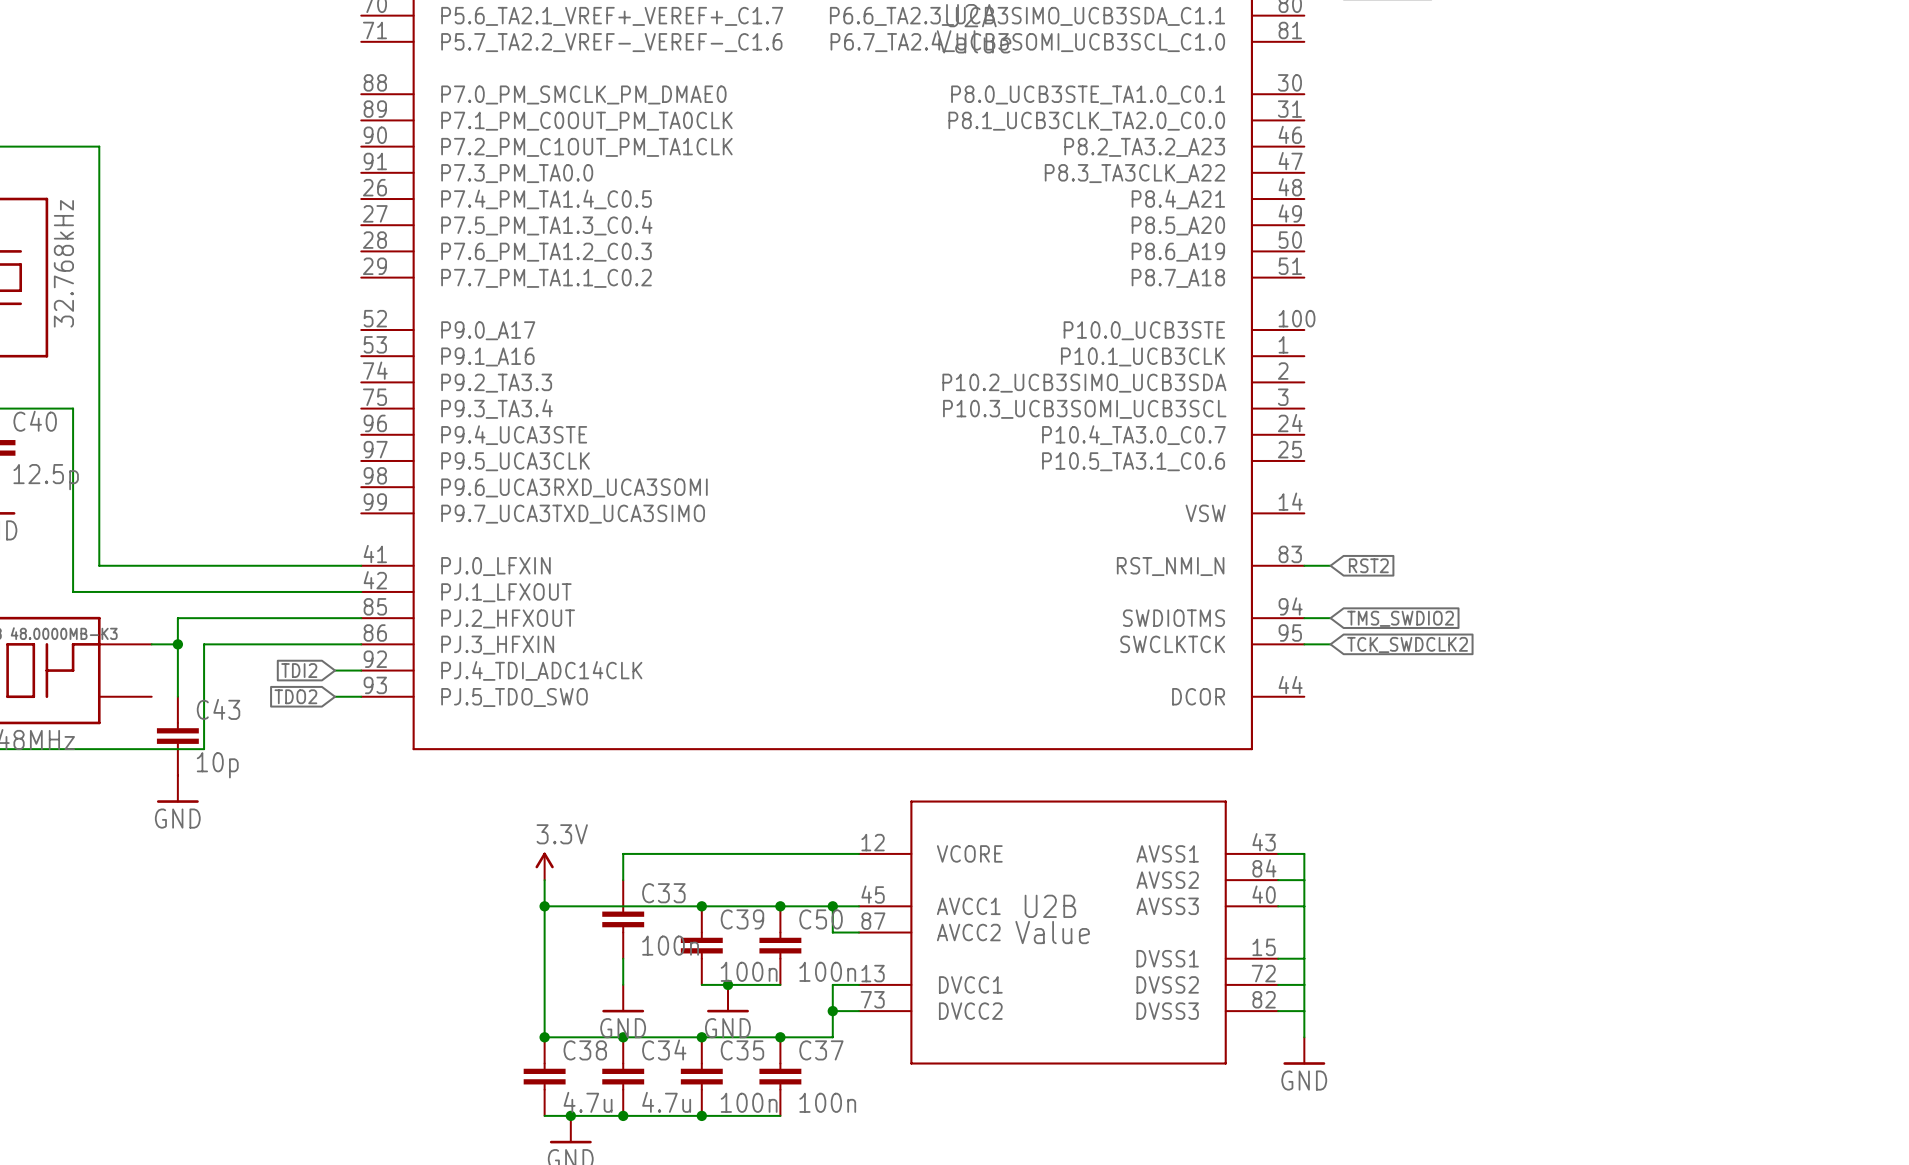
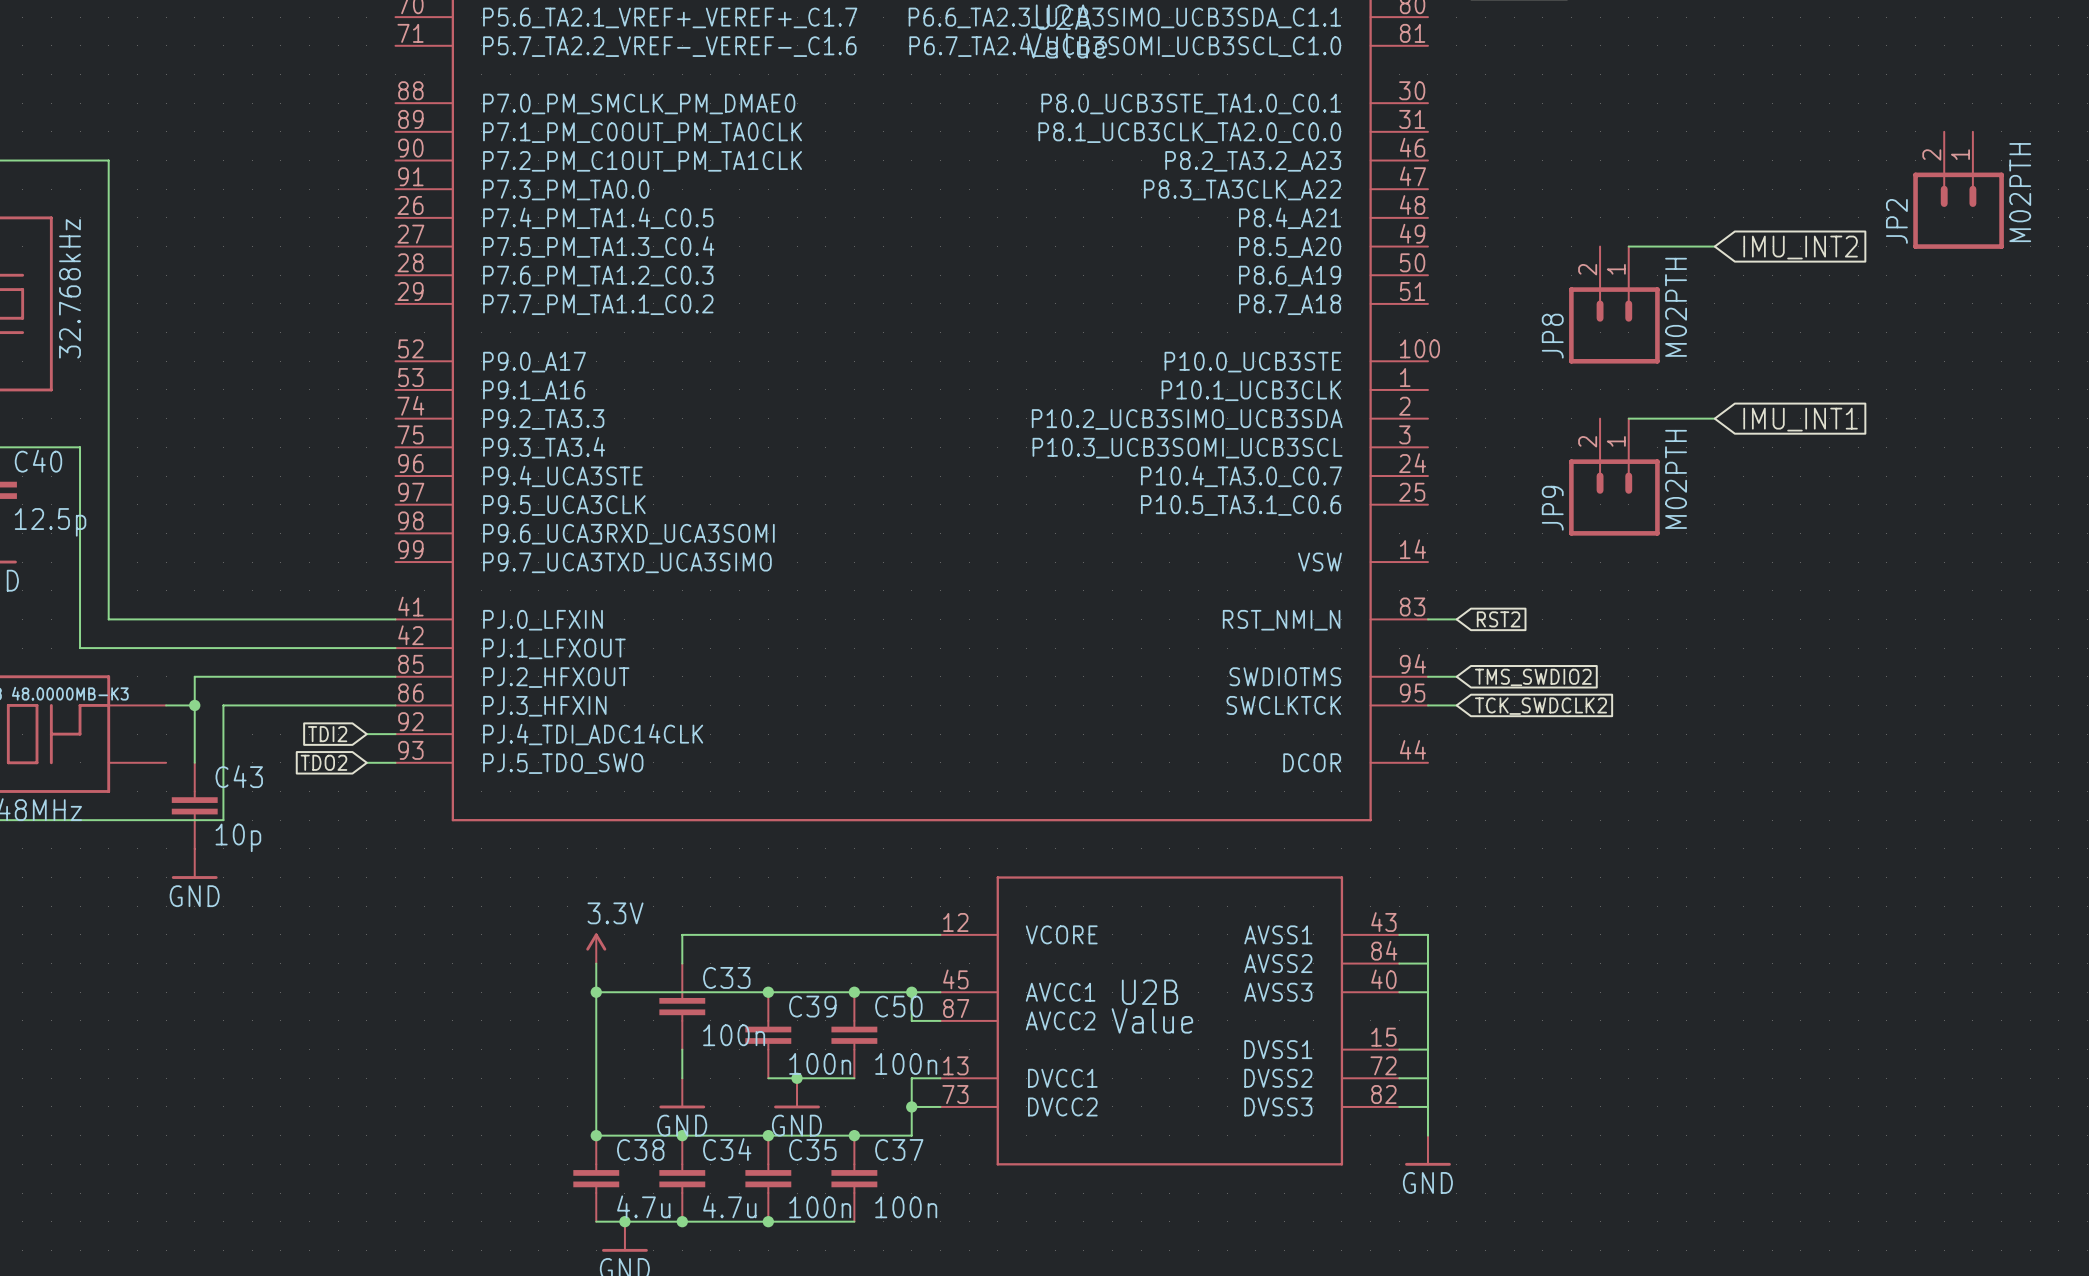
JP2: none -> M02PTH (1958, 190)
wire: none -> (1628, 246) (1714, 246)
global label: none -> IMU_INT2 (1800, 247)
JP8: none -> M02PTH (1614, 305)
wire: none -> (1628, 418) (1714, 418)
global label: none -> IMU_INT1 (1800, 419)
JP9: none -> M02PTH (1614, 477)

